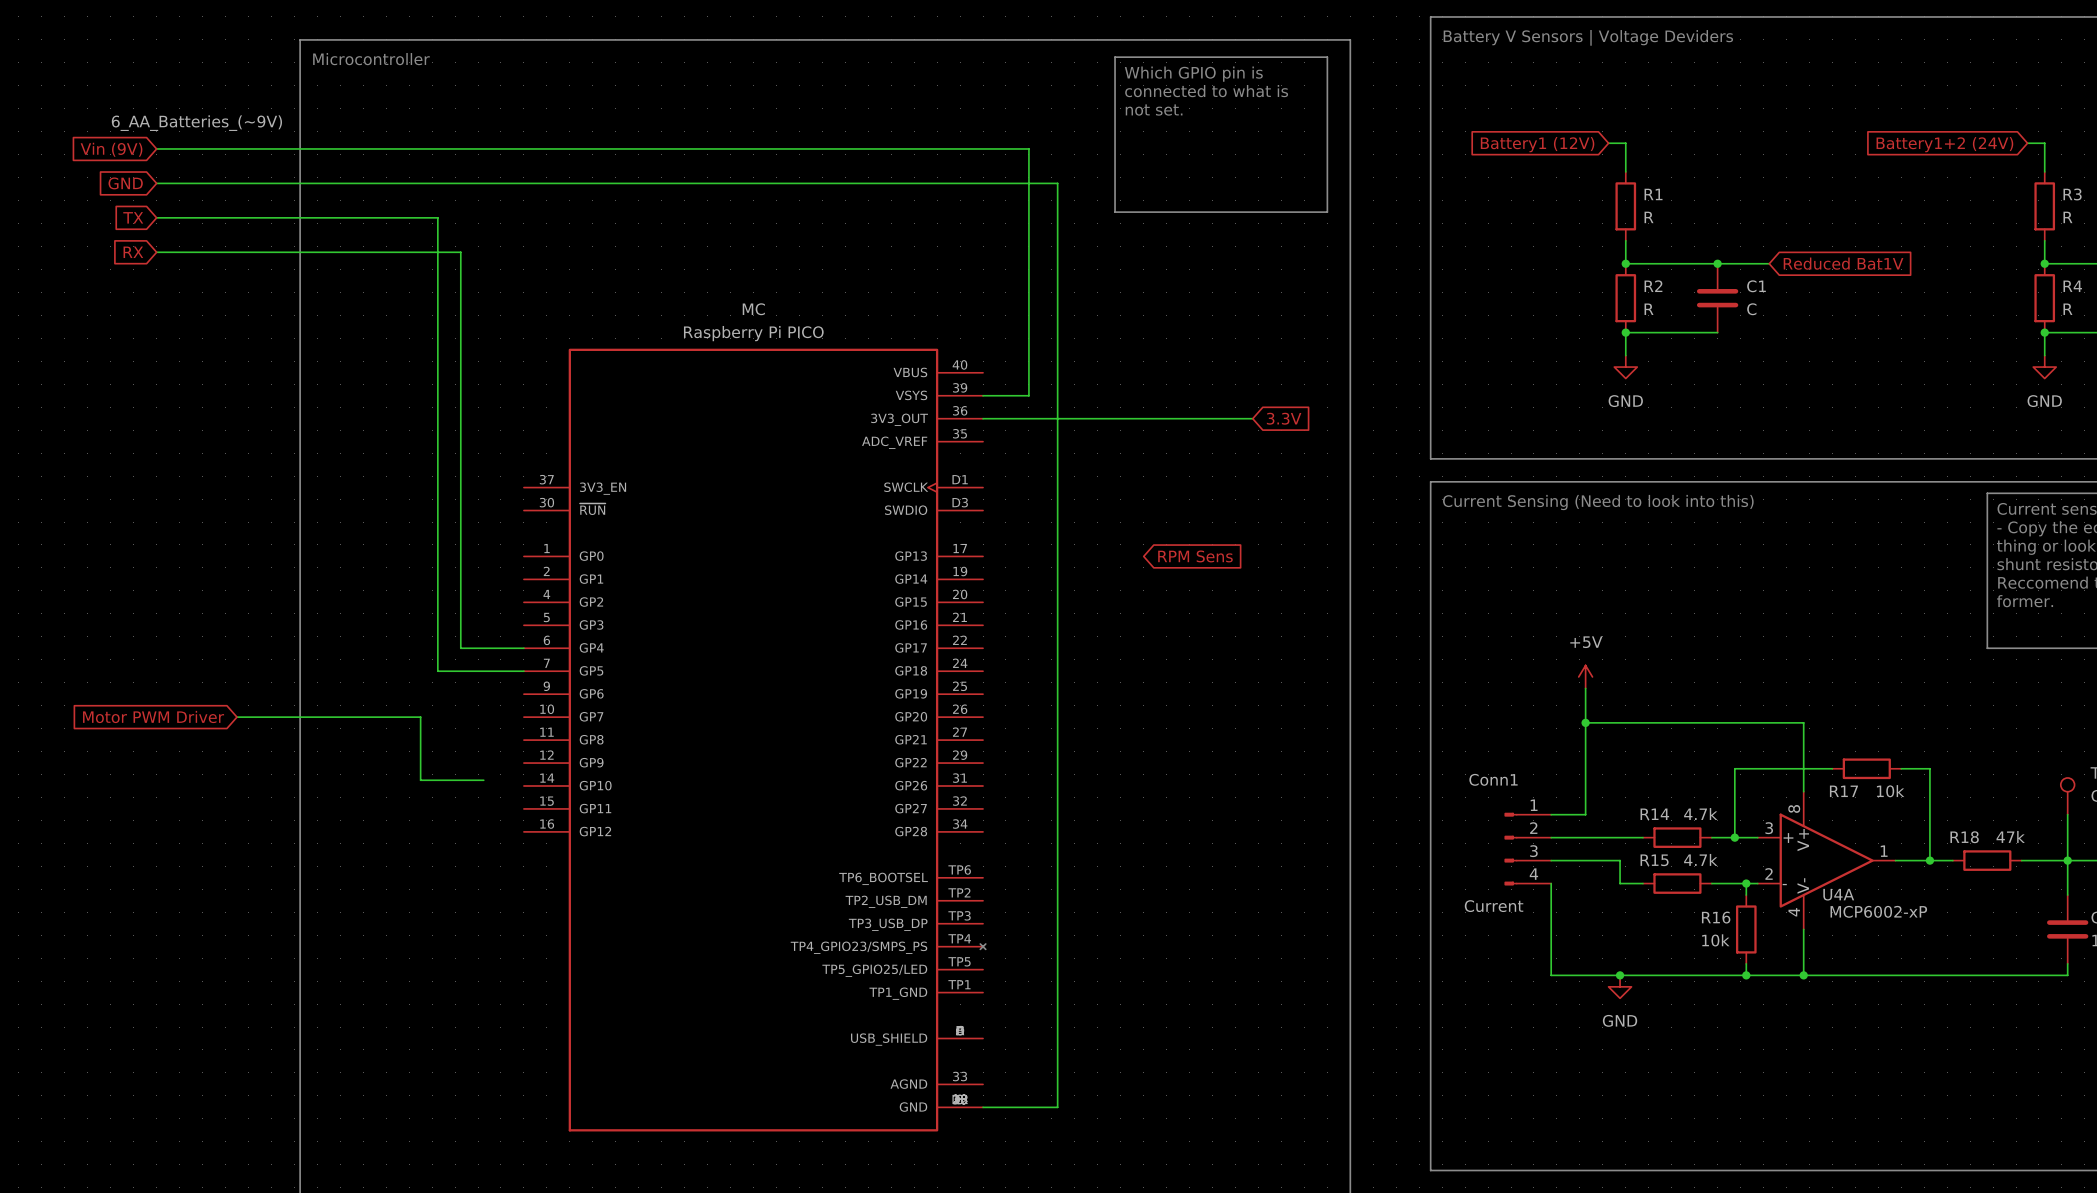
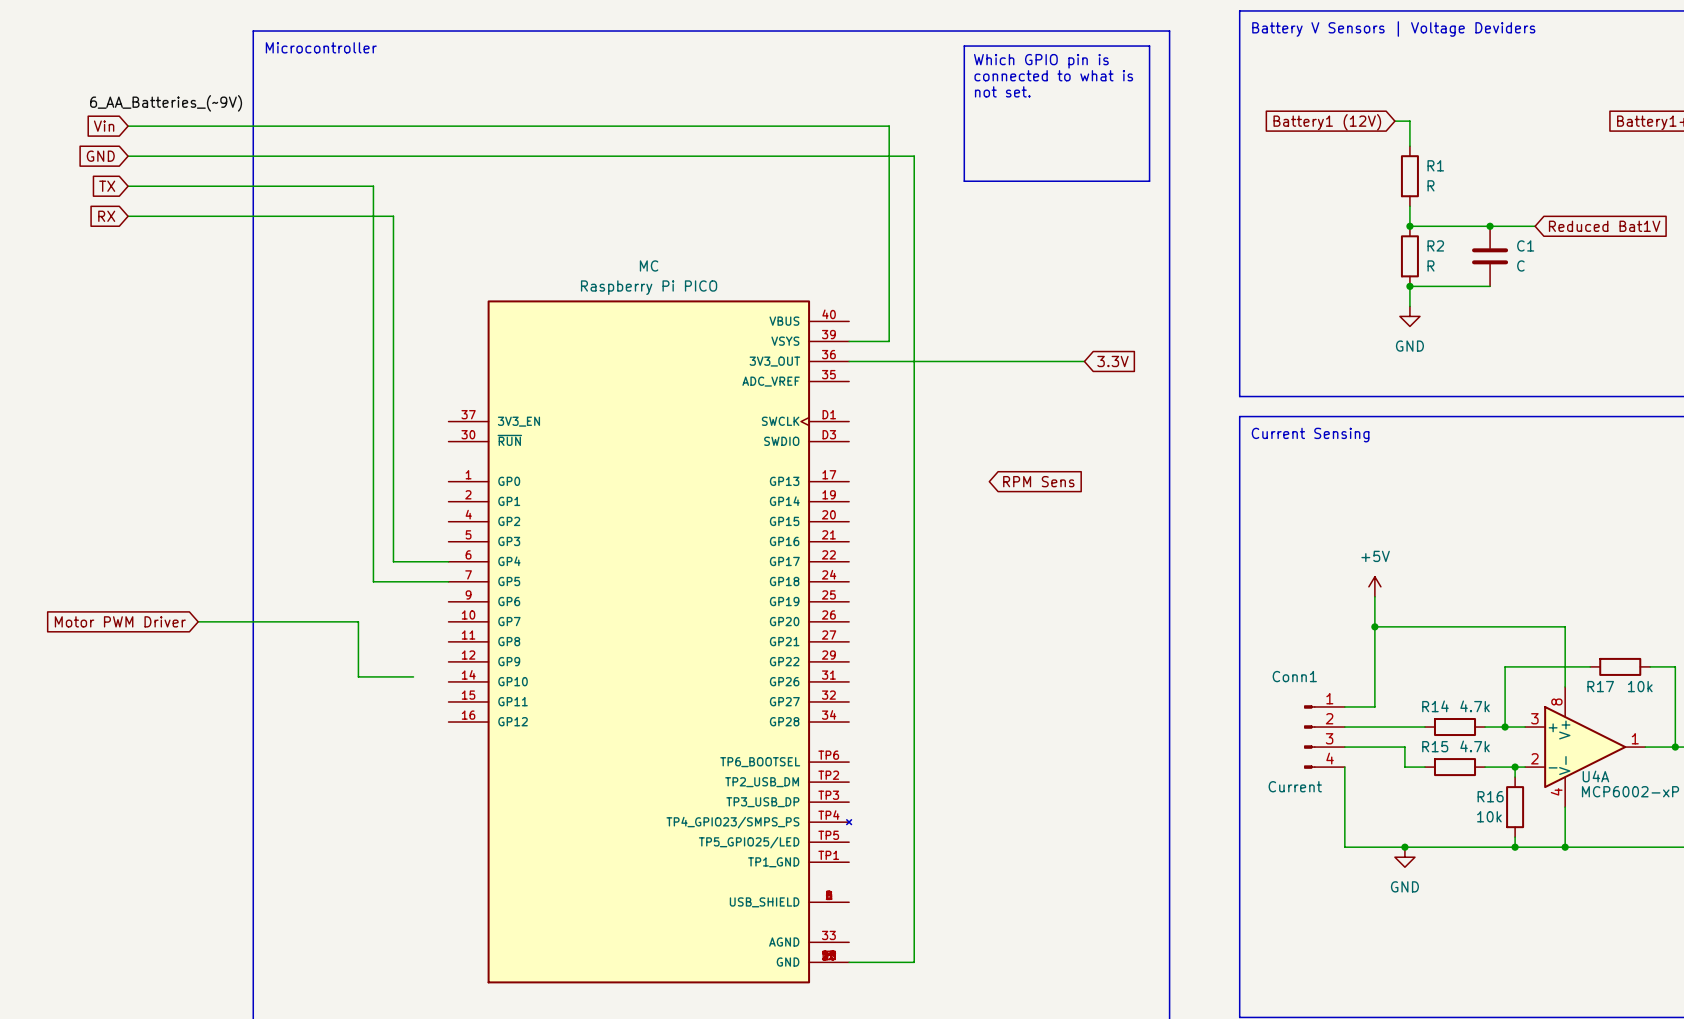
global label: Vin (9V) (111, 149) -> Vin (104, 126)
text: Current Sensing (Need to look into this) (1598, 502) -> Current Sensing (1310, 435)

